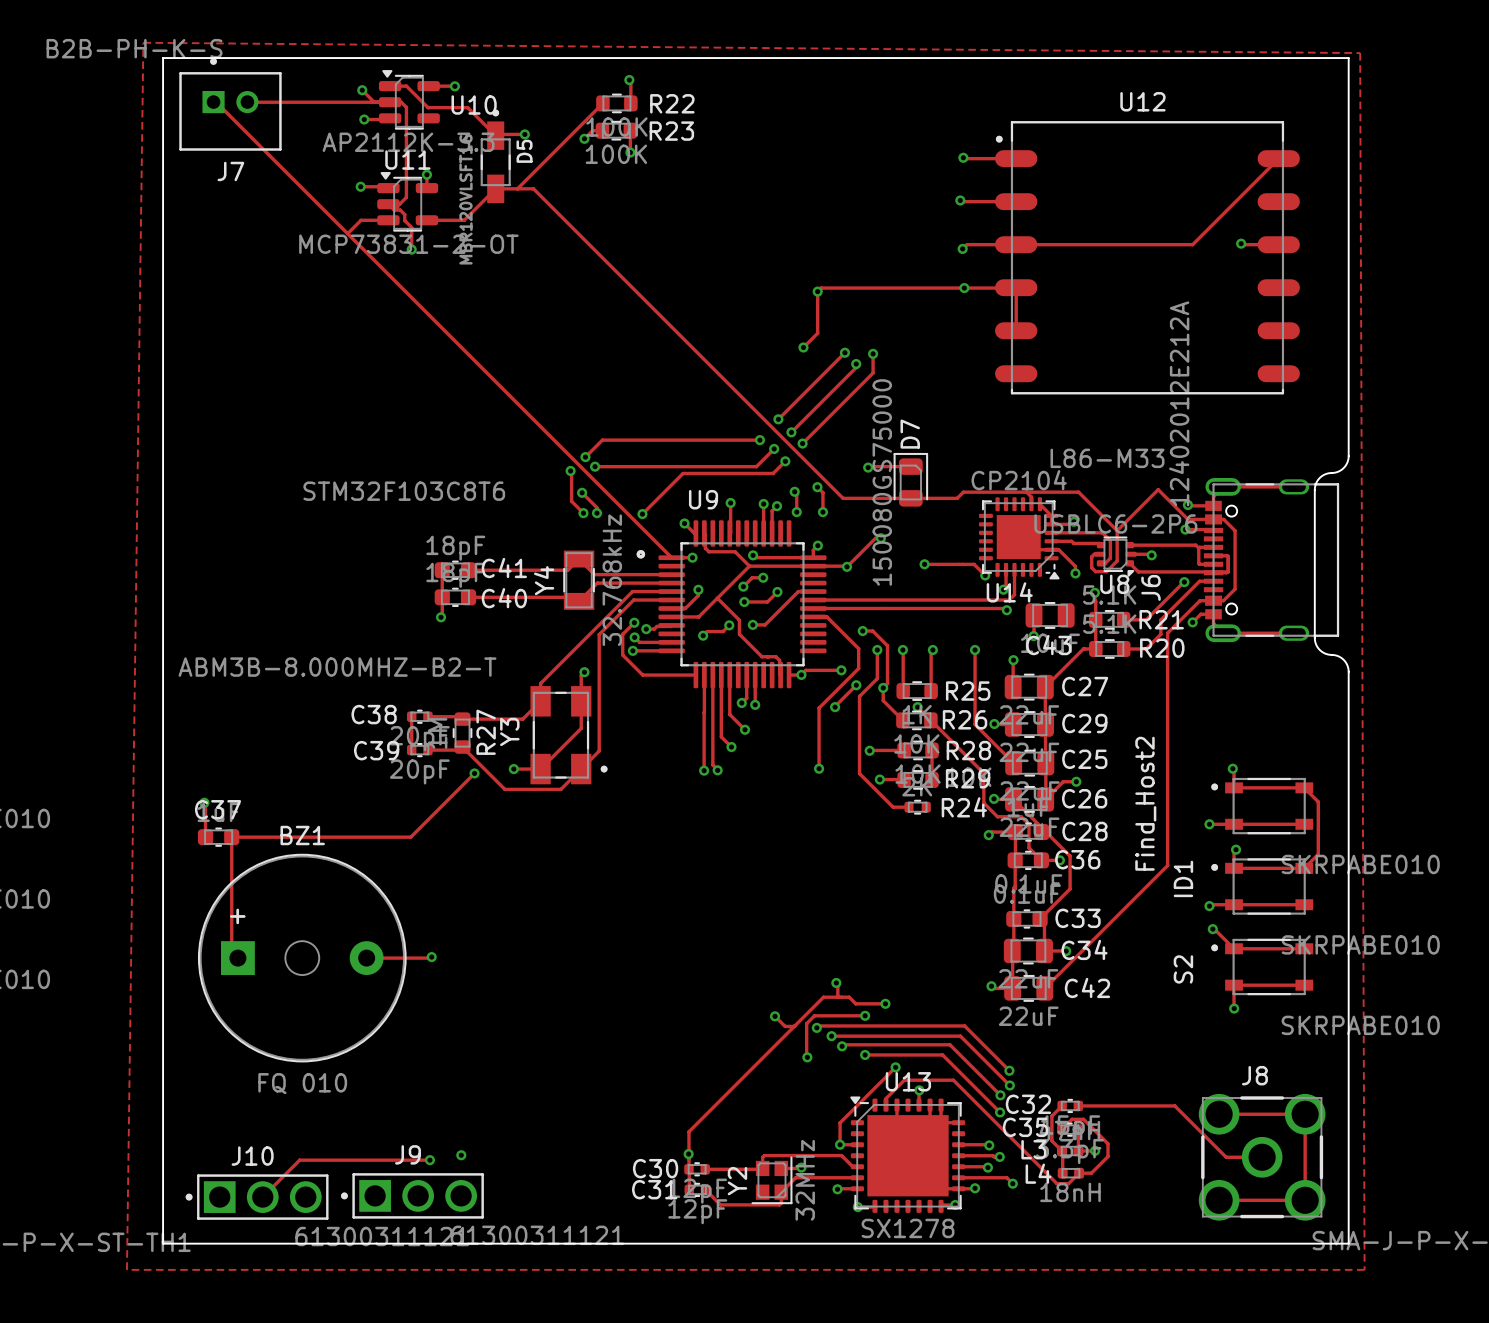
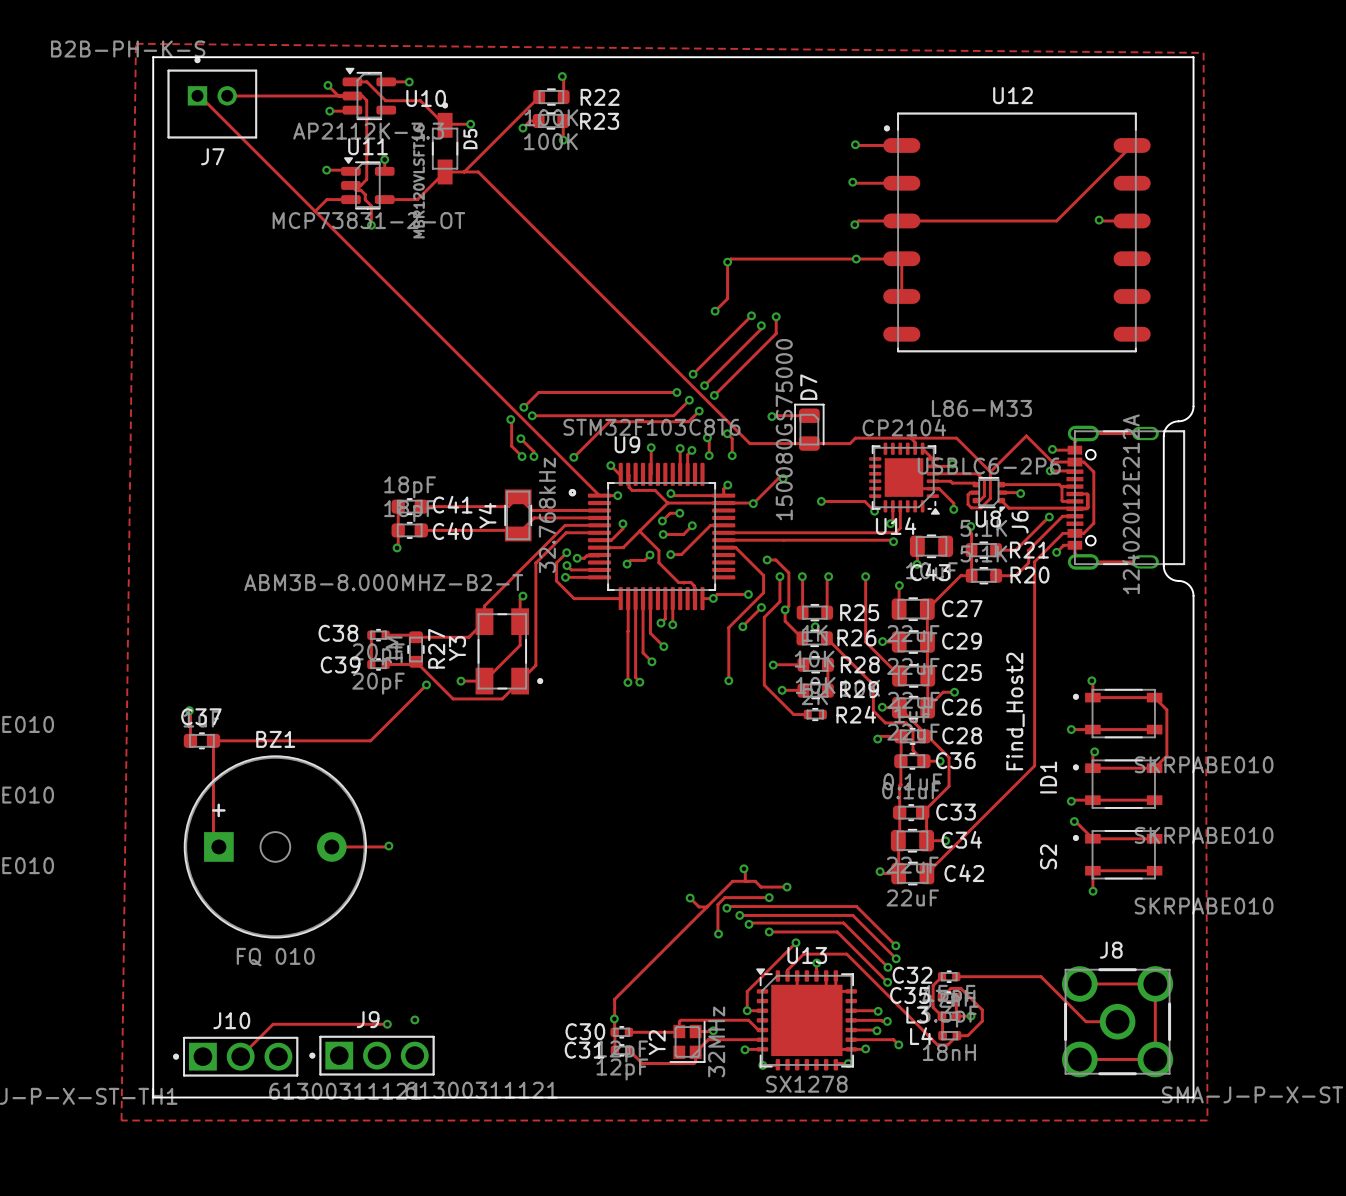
J6 value position: 12402012E212A (1179, 403) -> 12402012E212A (1130, 504)
U9 value position: STM32F103C8T6 (404, 491) -> STM32F103C8T6 (651, 427)
Y3 value position: ABM3B-8.000MHZ-B2-T (337, 667) -> ABM3B-8.000MHZ-B2-T (383, 582)

